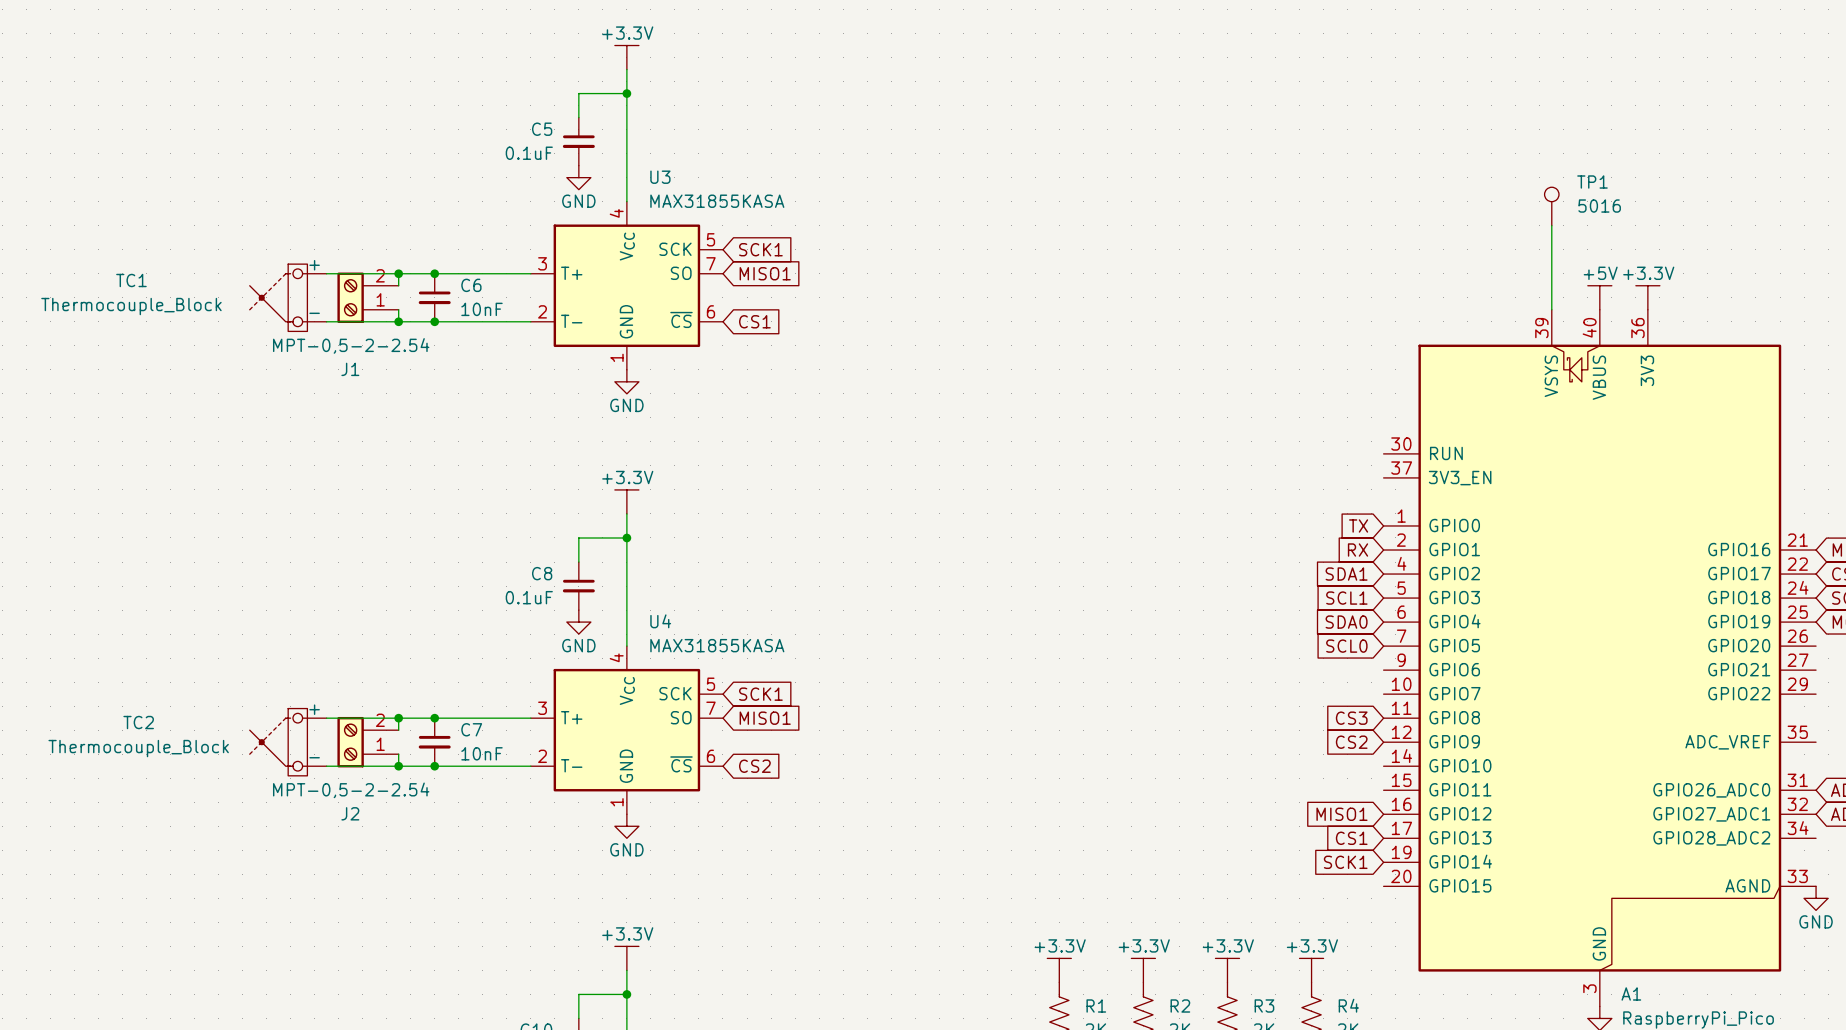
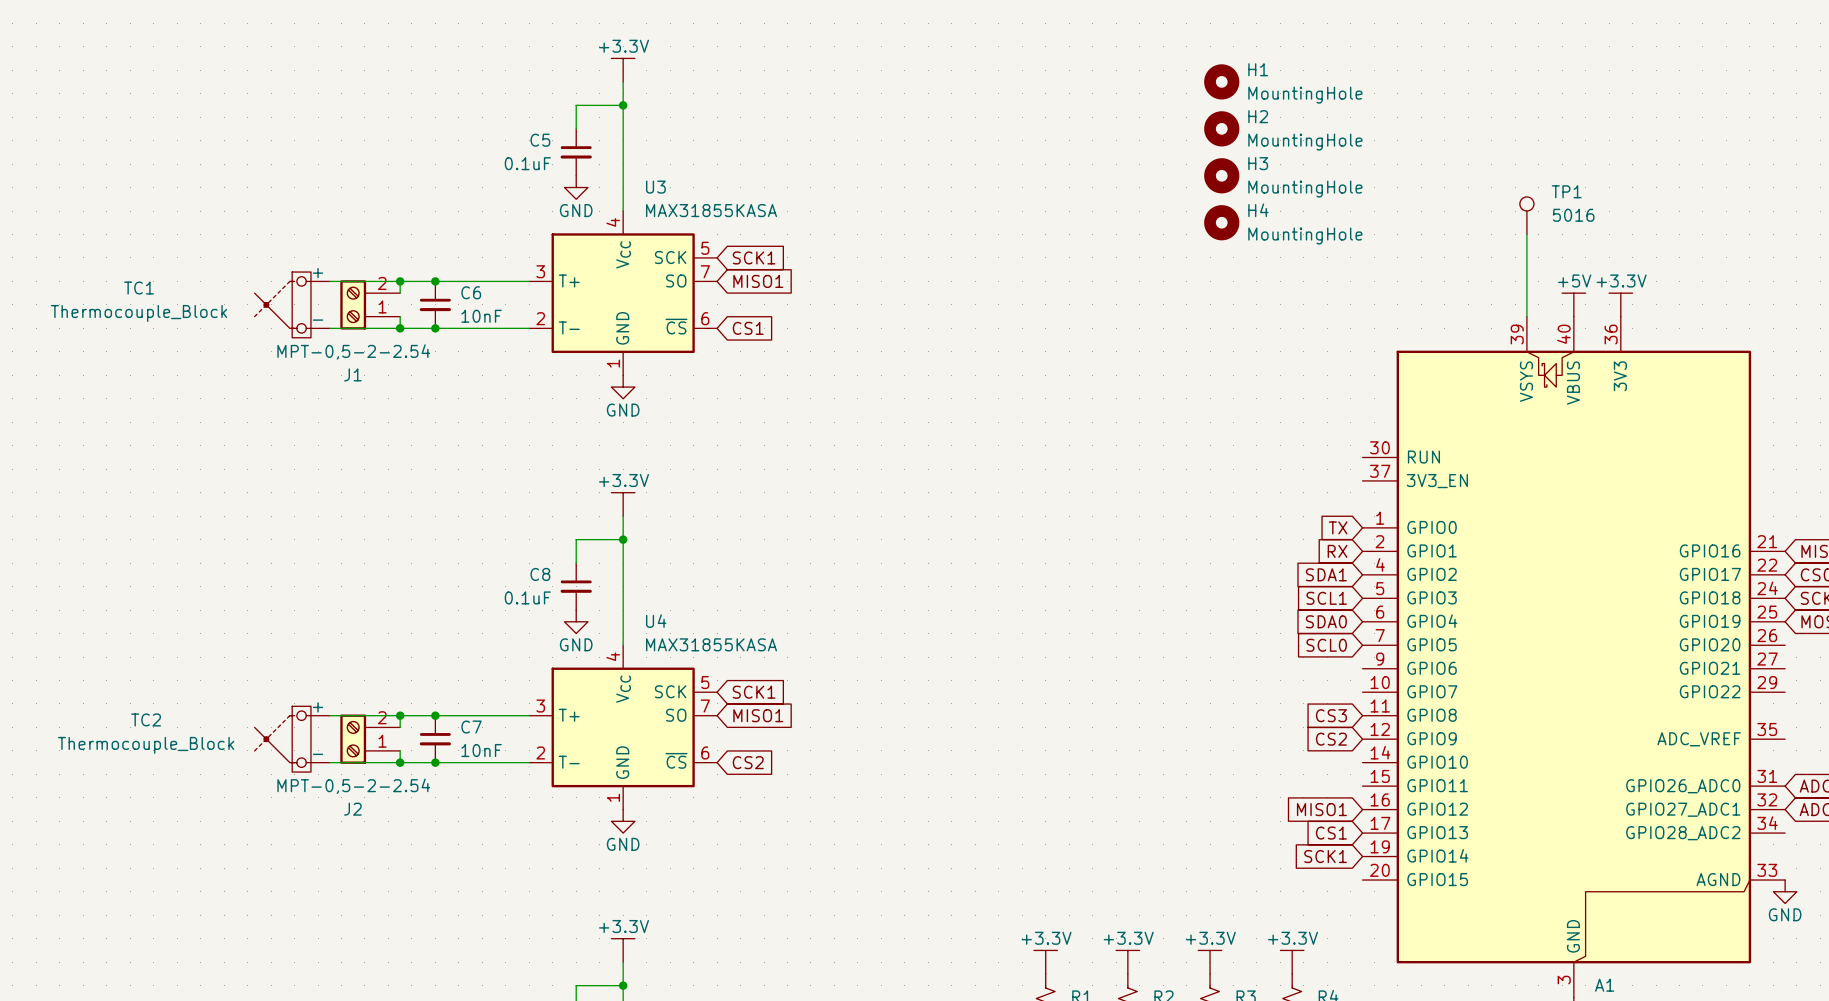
H1: none -> MountingHole (1221, 81)
H2: none -> MountingHole (1221, 128)
H3: none -> MountingHole (1221, 175)
H4: none -> MountingHole (1221, 222)

